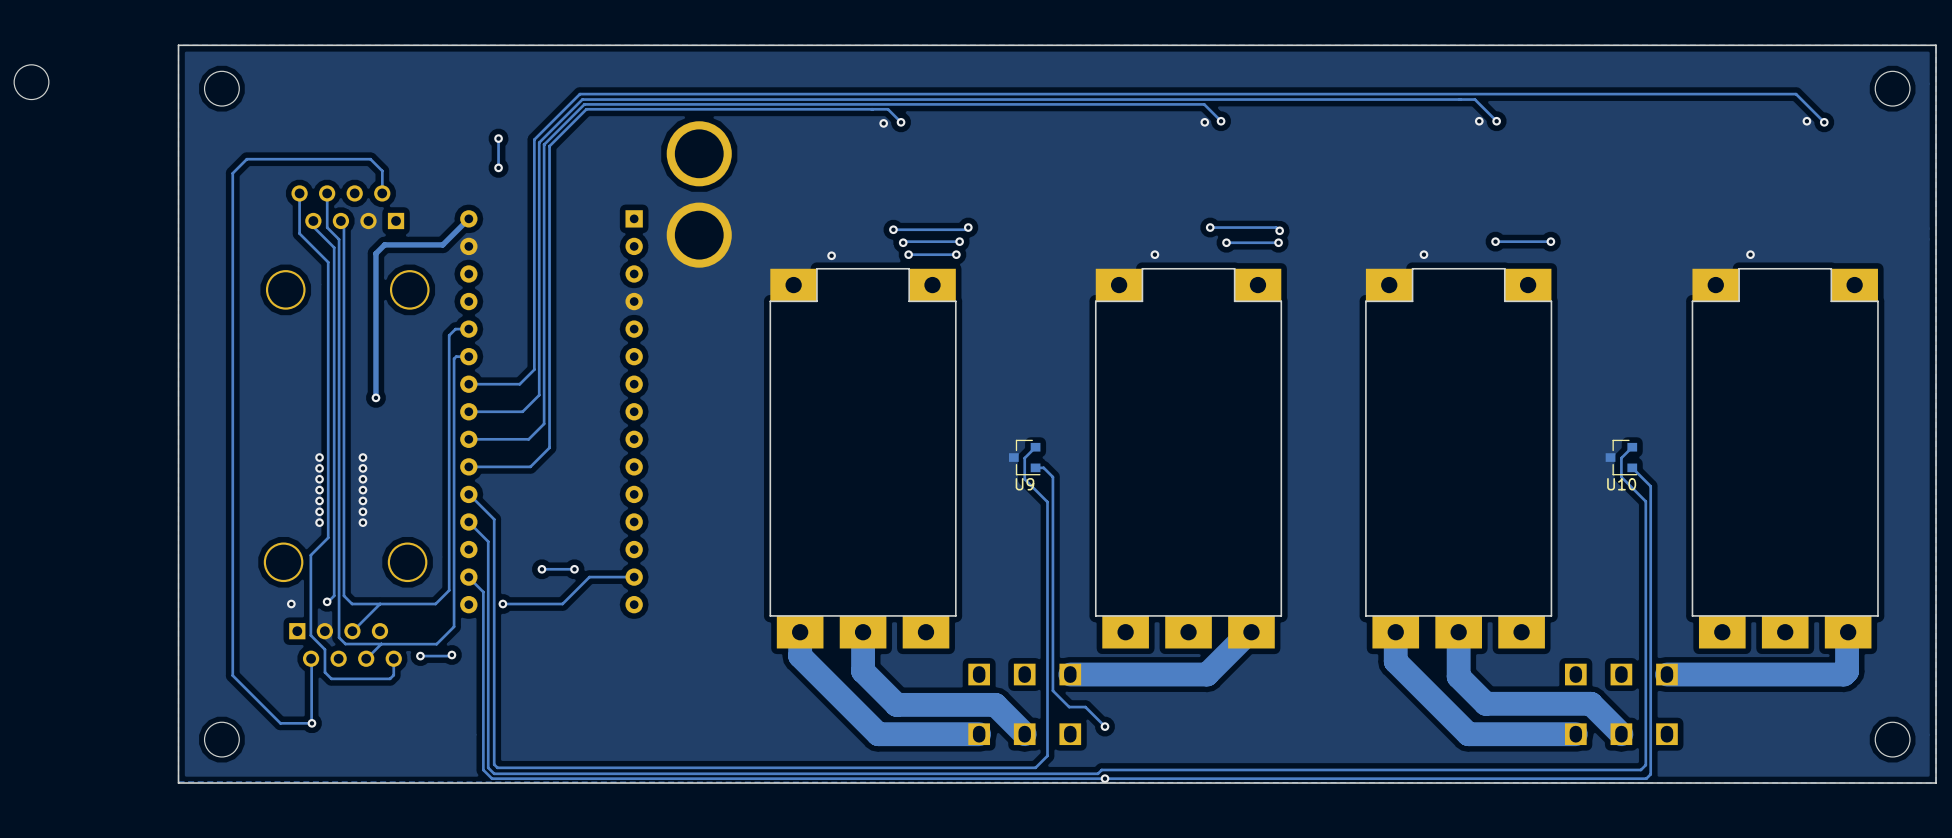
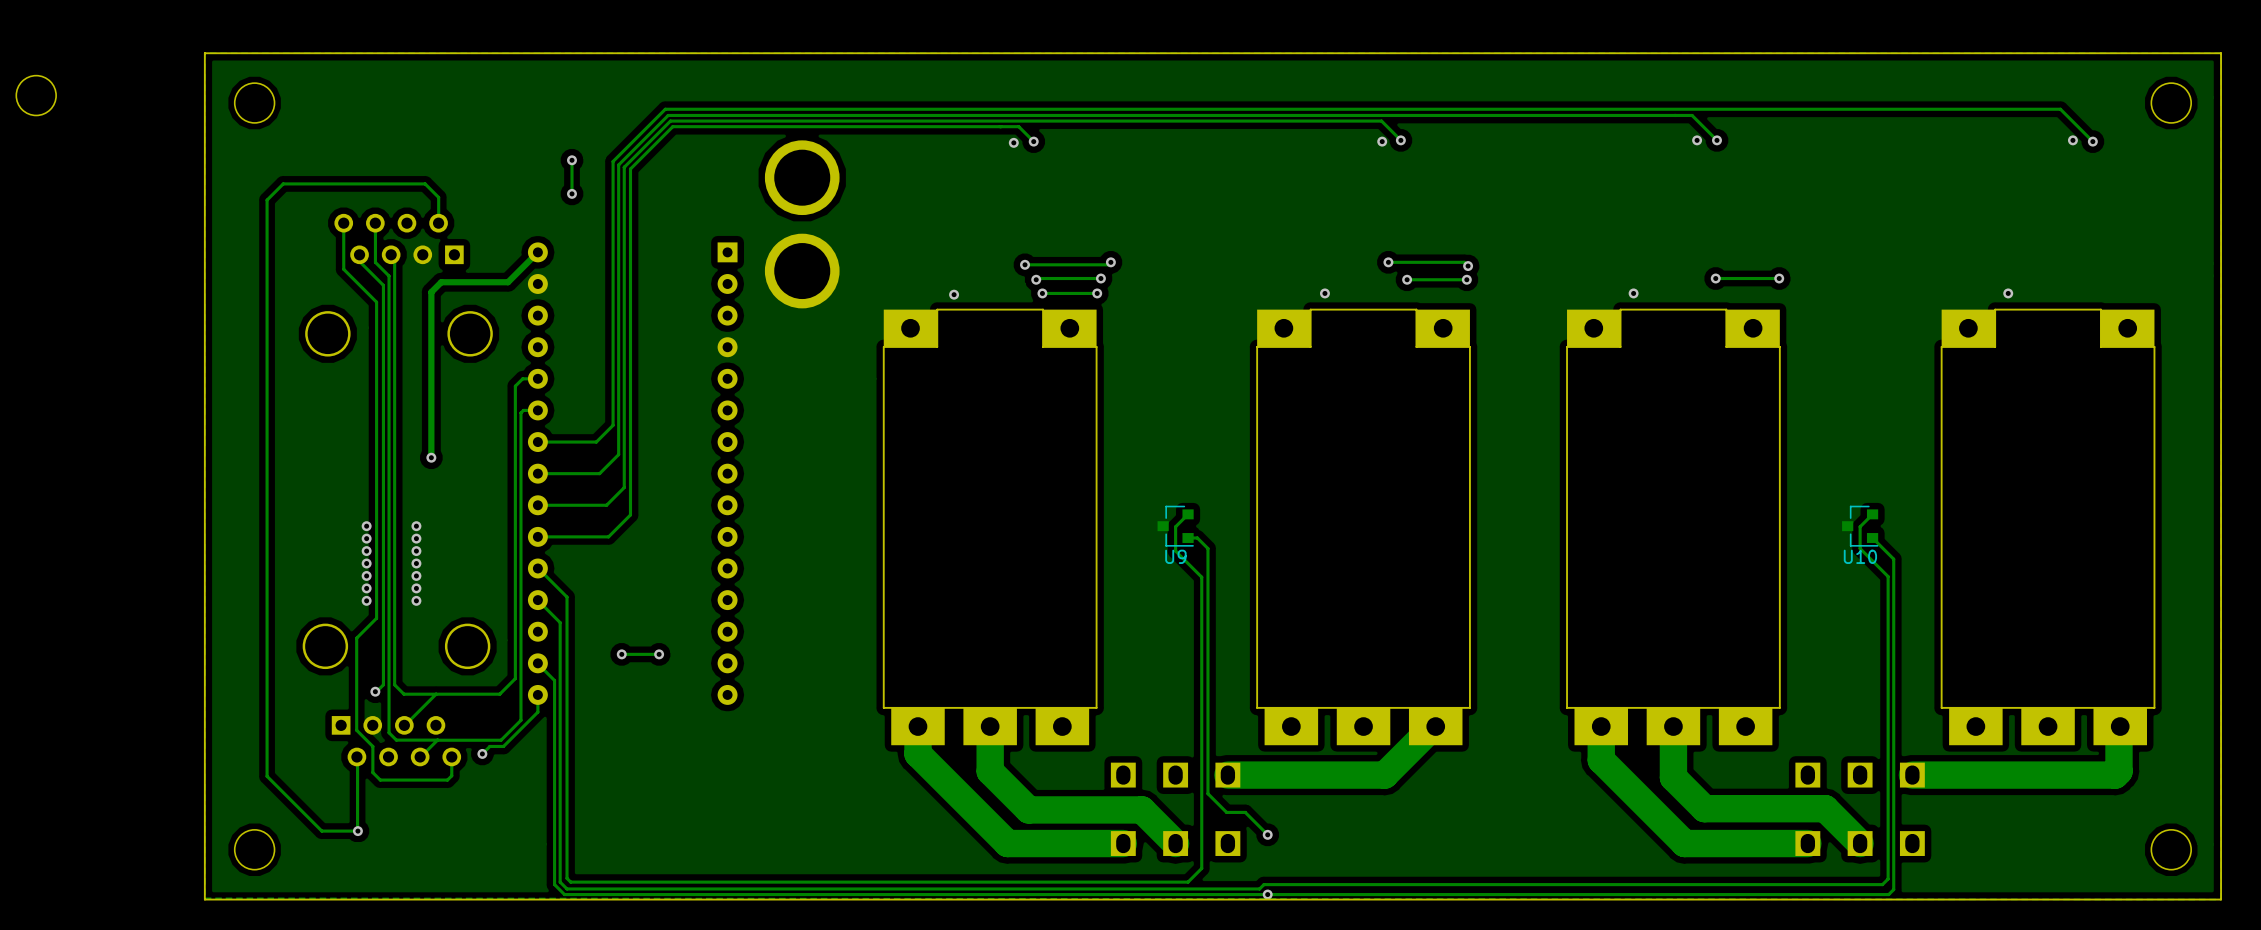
track: (634, 577) (589, 577) (562, 604) (502, 604) -> none
via: (291, 604) -> none
via: (502, 604) -> none
track: (451, 654) (420, 656) -> (537, 694) (537, 712) (503, 746) (489, 746) (482, 753)
via: (451, 654) -> none

